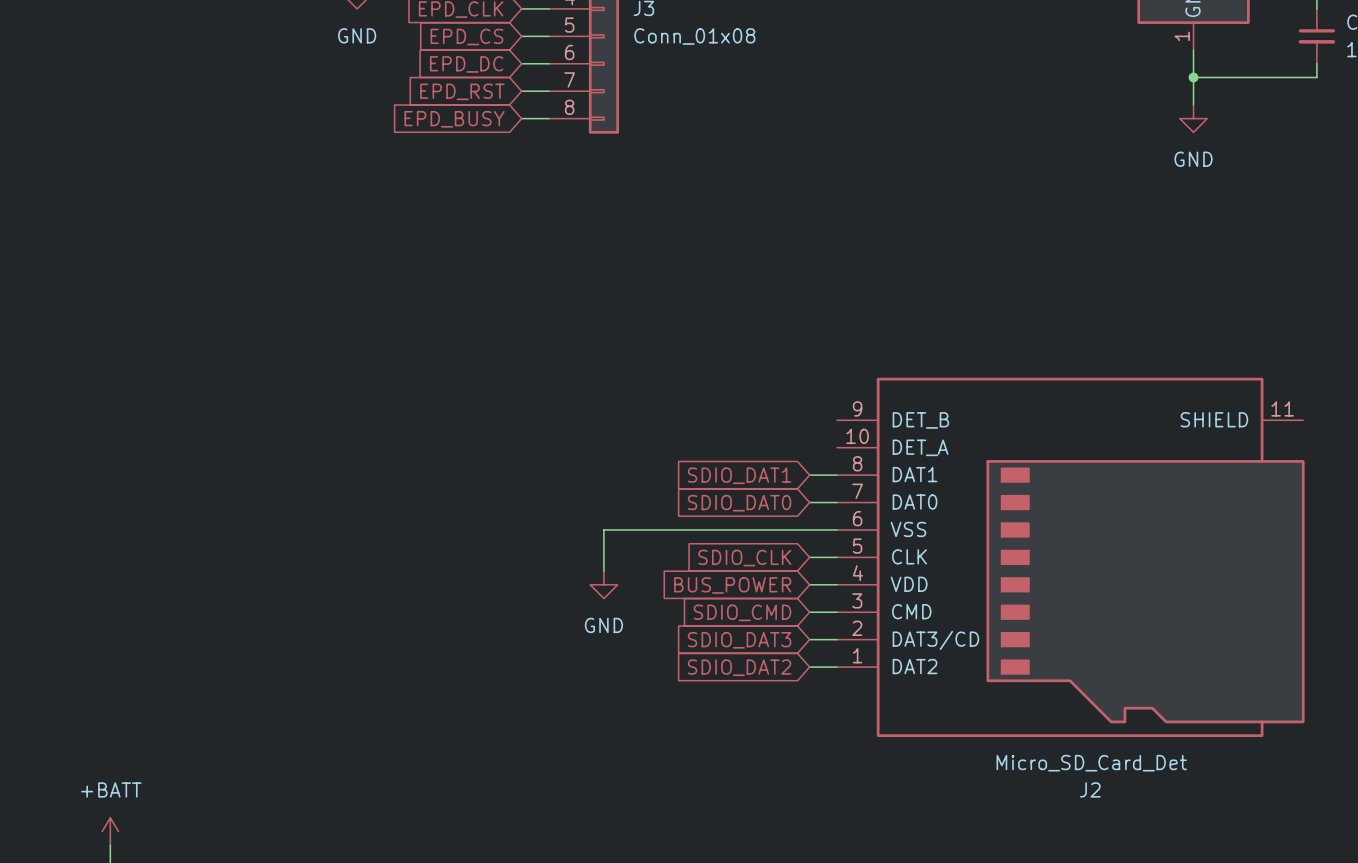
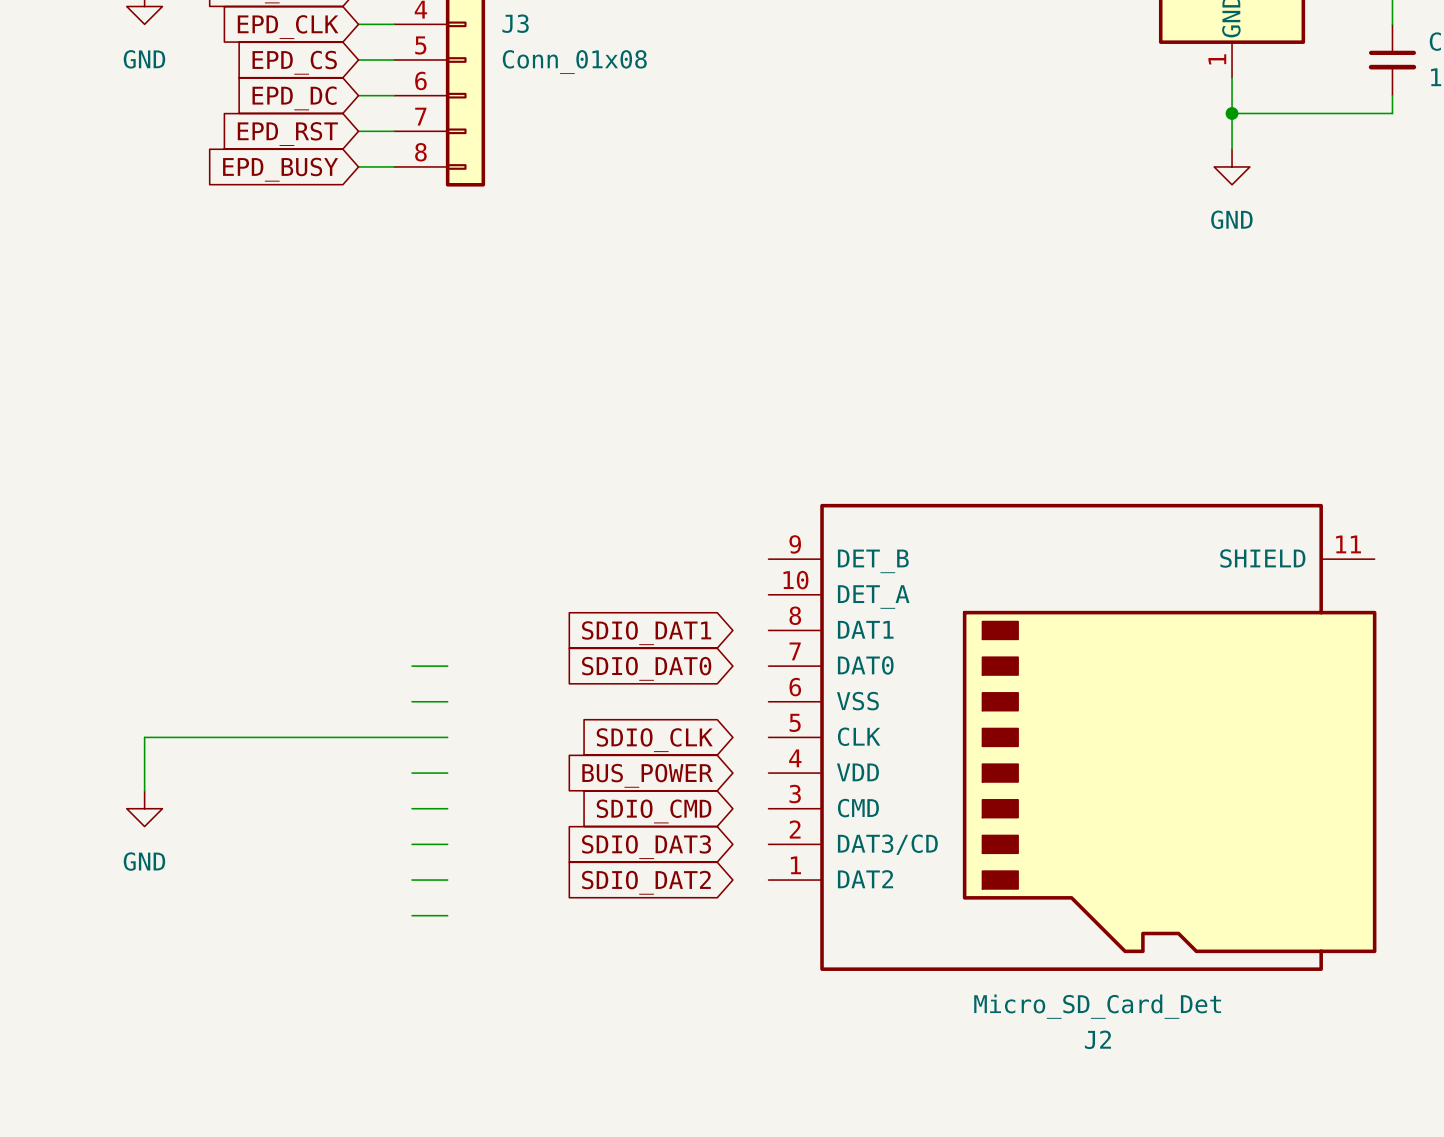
wire: (809, 475) (837, 475) -> (412, 666) (447, 666)
wire: (809, 502) (837, 502) -> (412, 701) (447, 701)
wire: (837, 529) (603, 529) (603, 571) -> (447, 737) (144, 737) (144, 790)
wire: (809, 557) (837, 557) -> (412, 773) (447, 773)
power symbol position: GND (603, 584) -> GND (144, 808)
wire: (809, 584) (837, 584) -> (412, 808) (447, 808)
wire: (809, 612) (837, 612) -> (412, 844) (447, 844)
wire: (809, 639) (837, 639) -> (412, 880) (447, 880)
wire: (809, 667) (837, 667) -> (412, 915) (447, 915)

